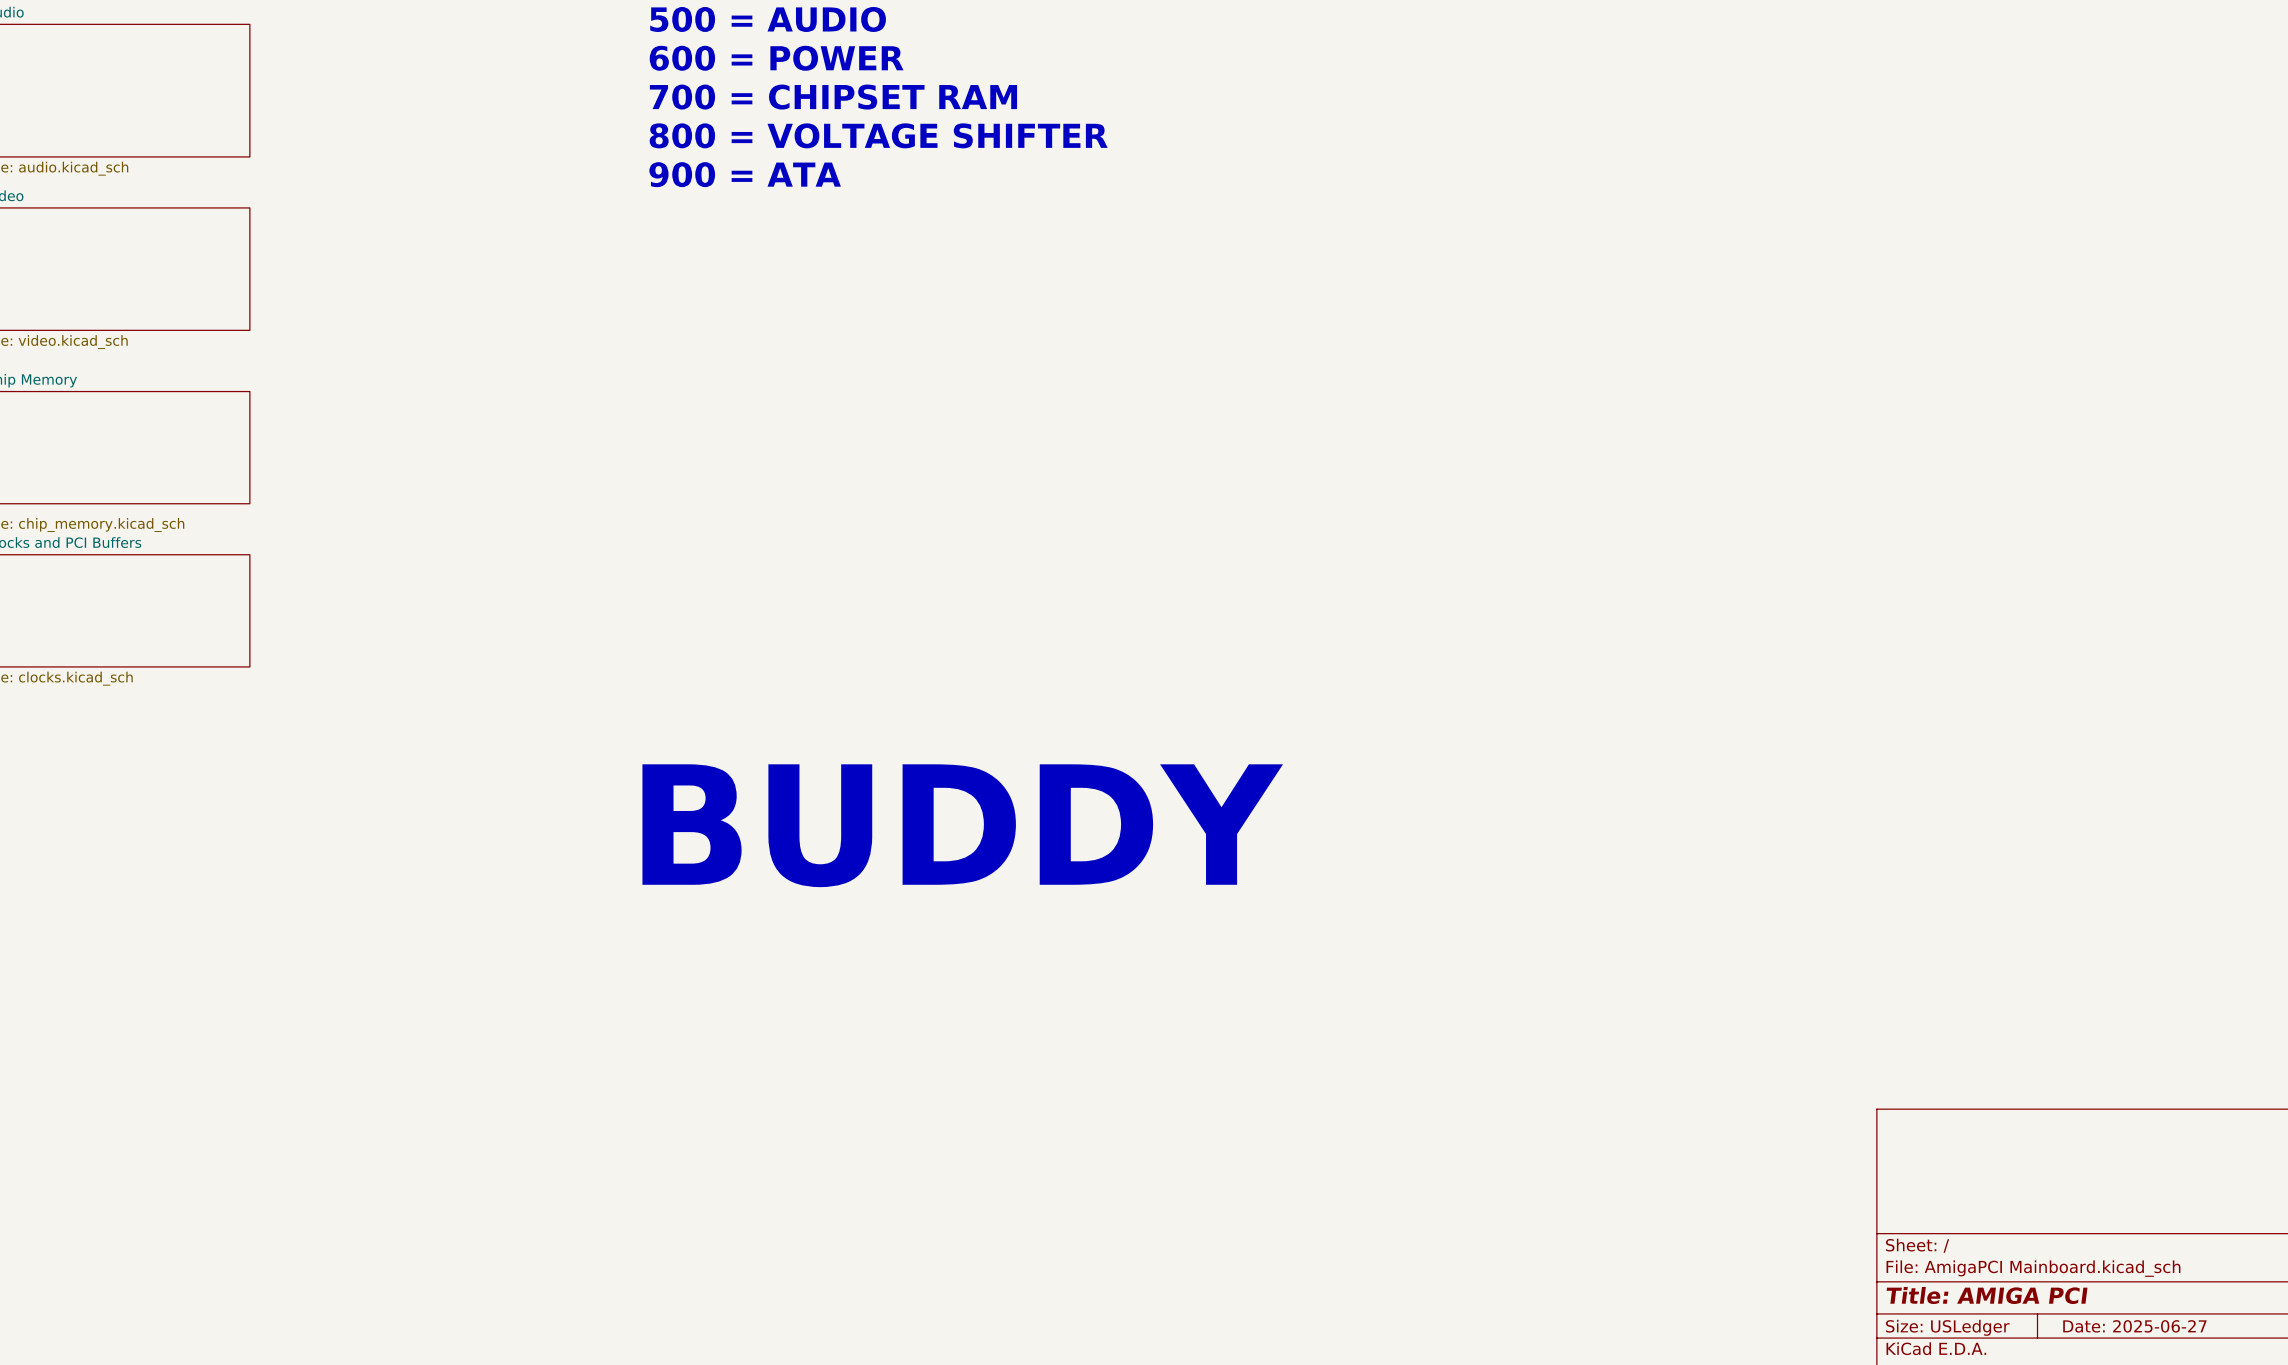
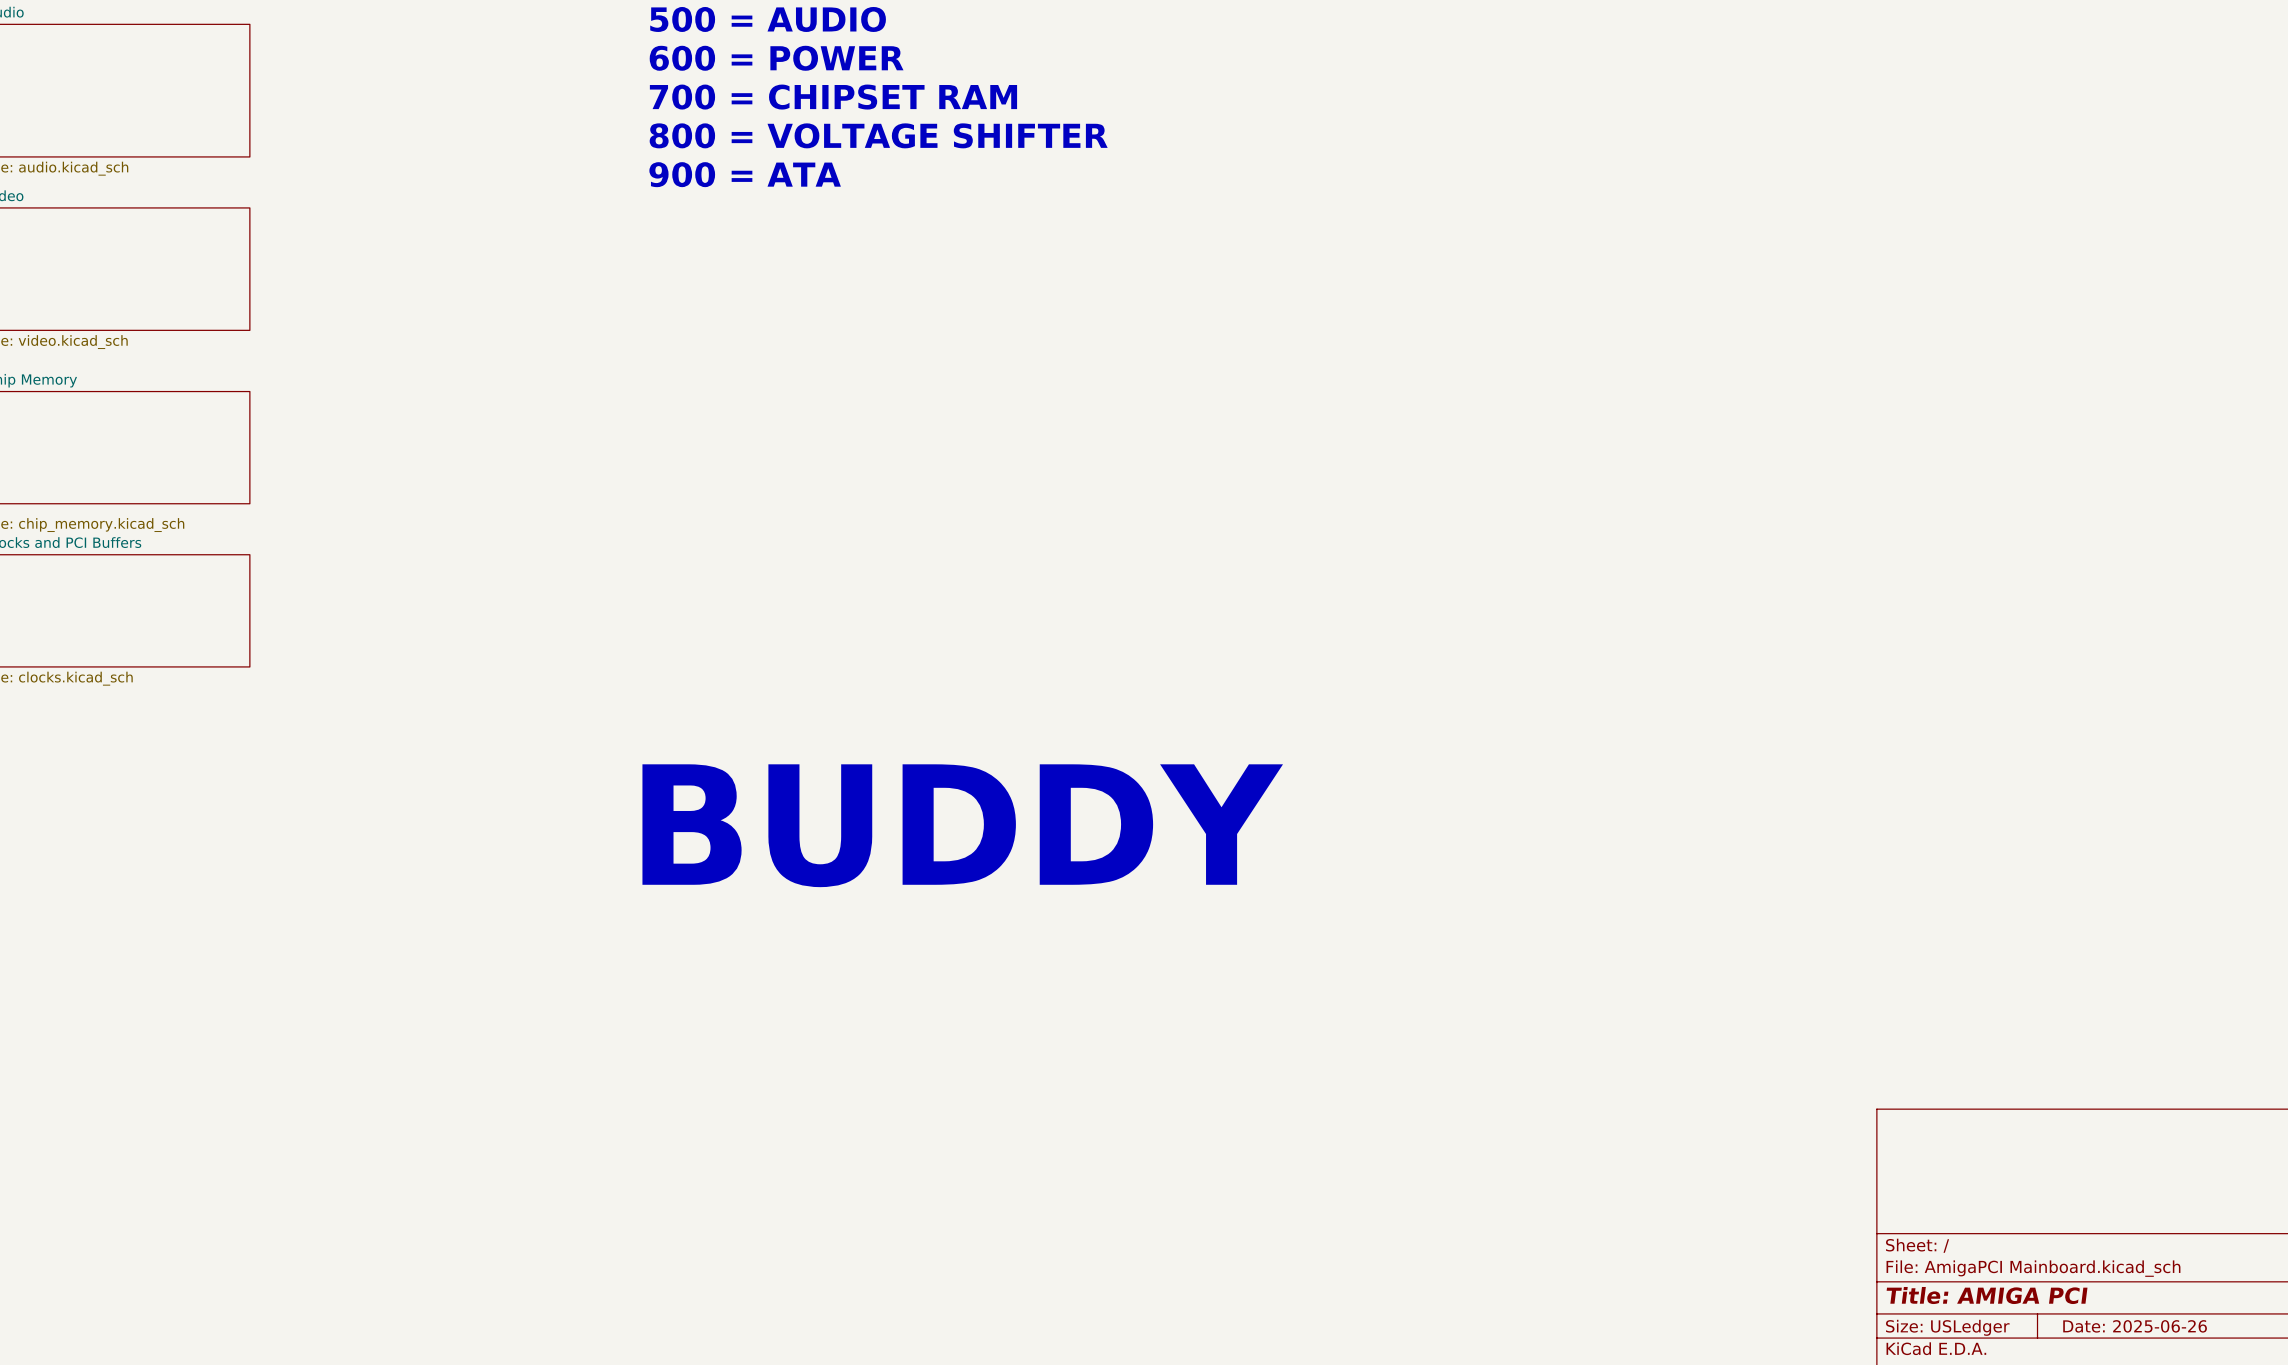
title block: Date: 2025-06-27 (2134, 1326) -> Date: 2025-06-26 (2135, 1326)

